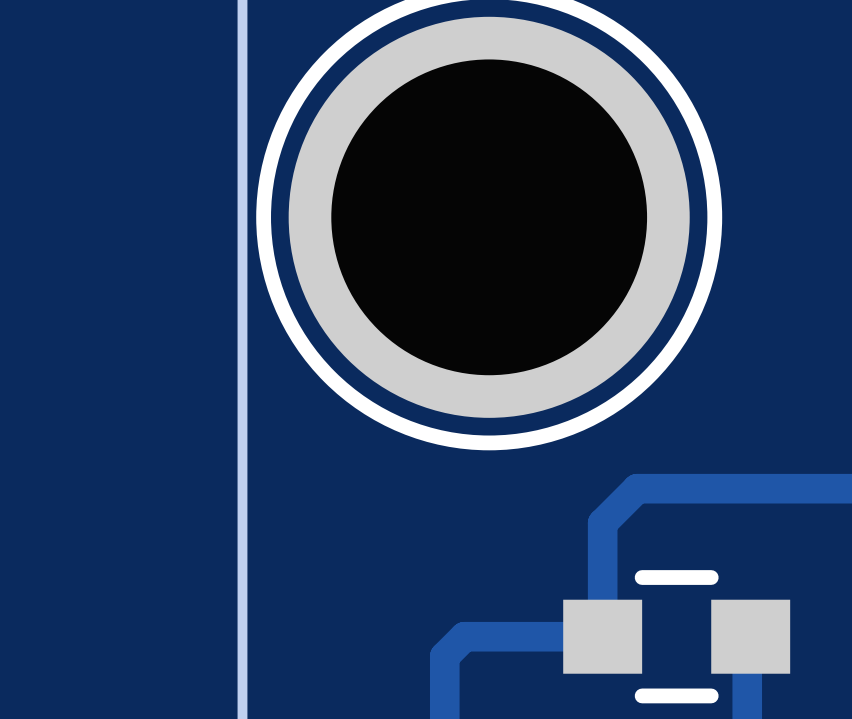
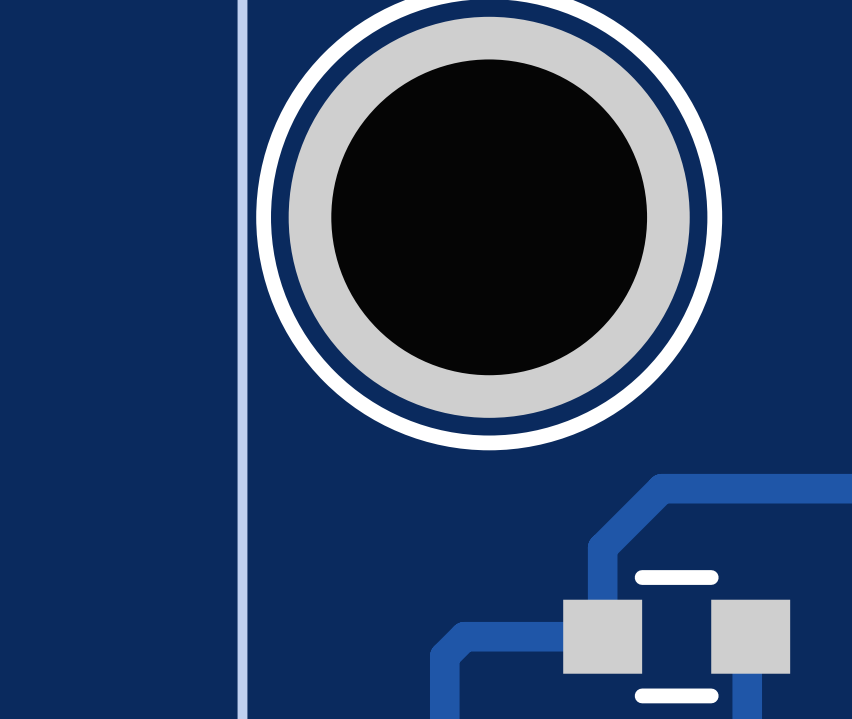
track: (661, 488) (637, 488) (602, 523) (602, 547) -> (661, 488) (602, 547)

